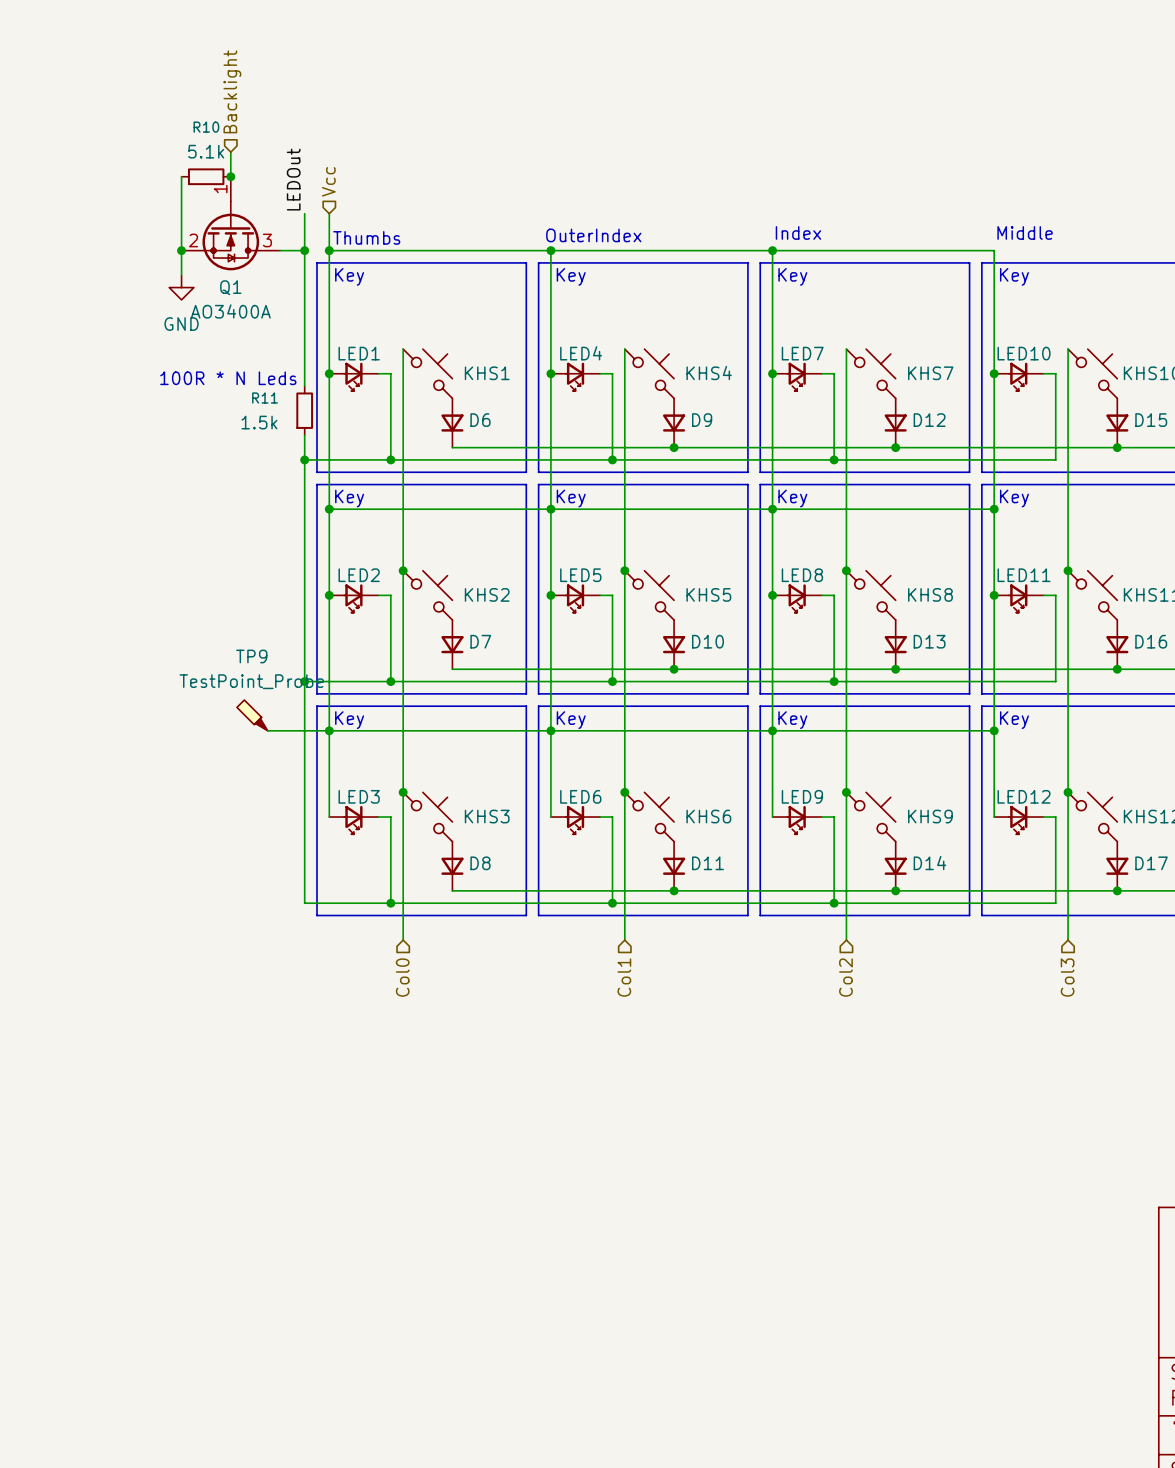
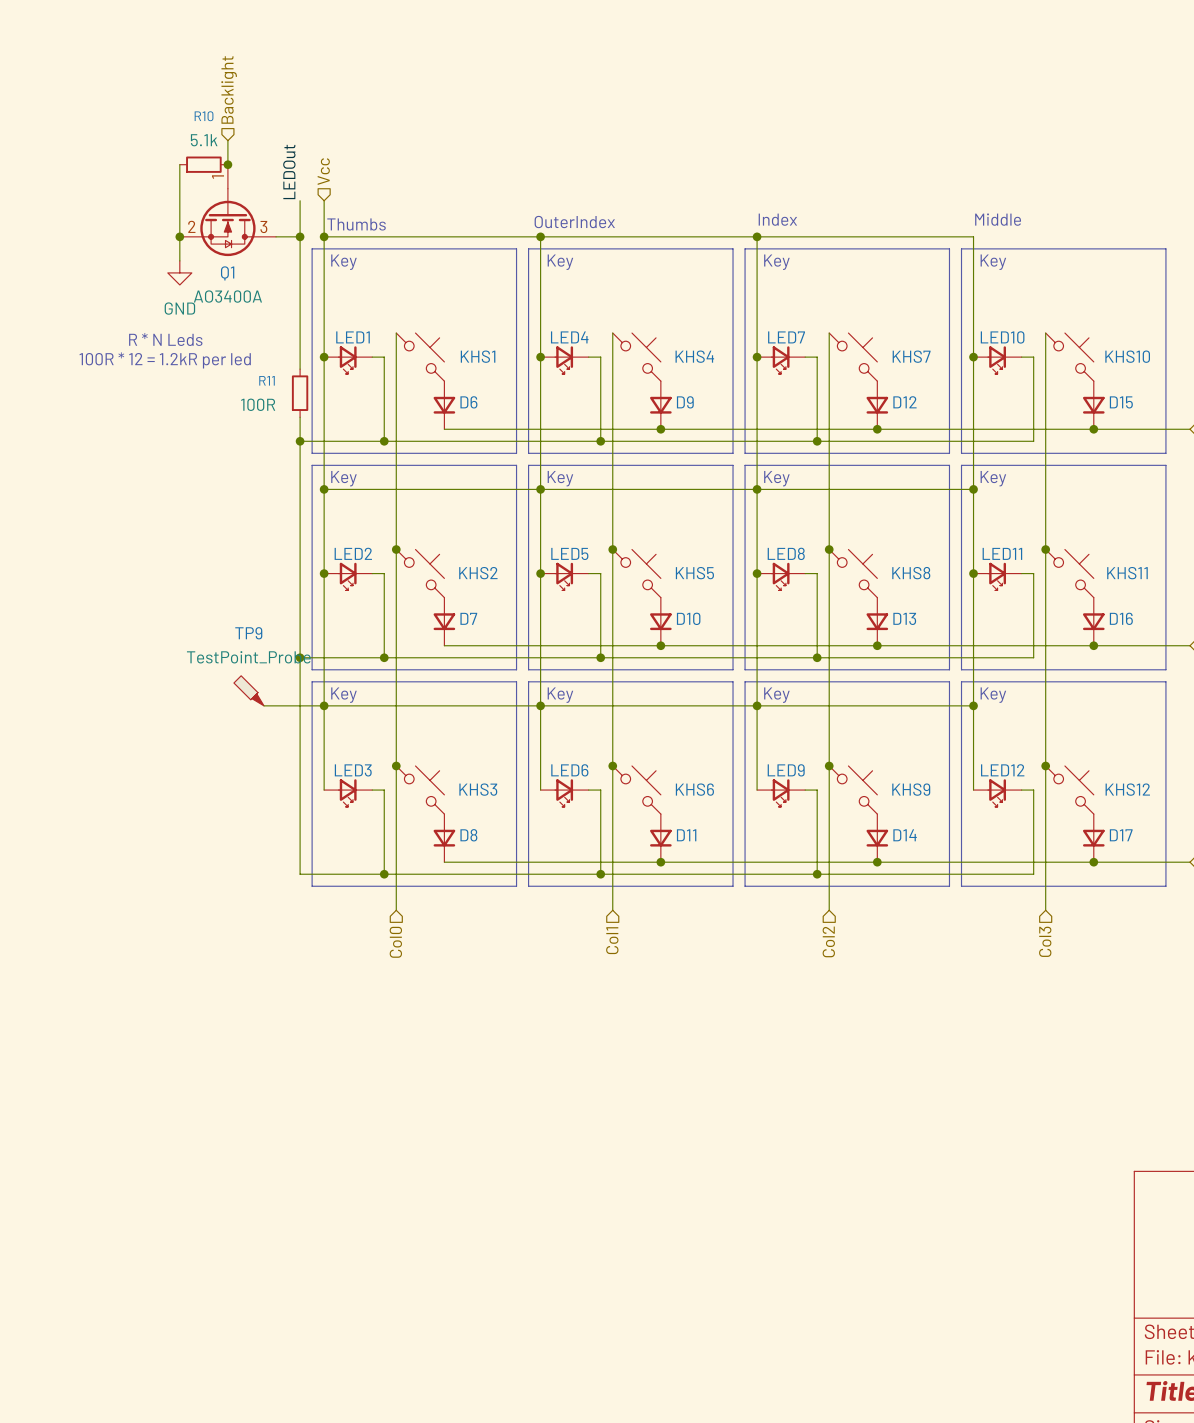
text: none -> 100R * 12 = 1.2kR per led (165, 360)
text: 100R * N Leds (228, 378) -> R * N Leds (165, 339)
R11 value: 1.5k (259, 422) -> 100R (258, 404)

